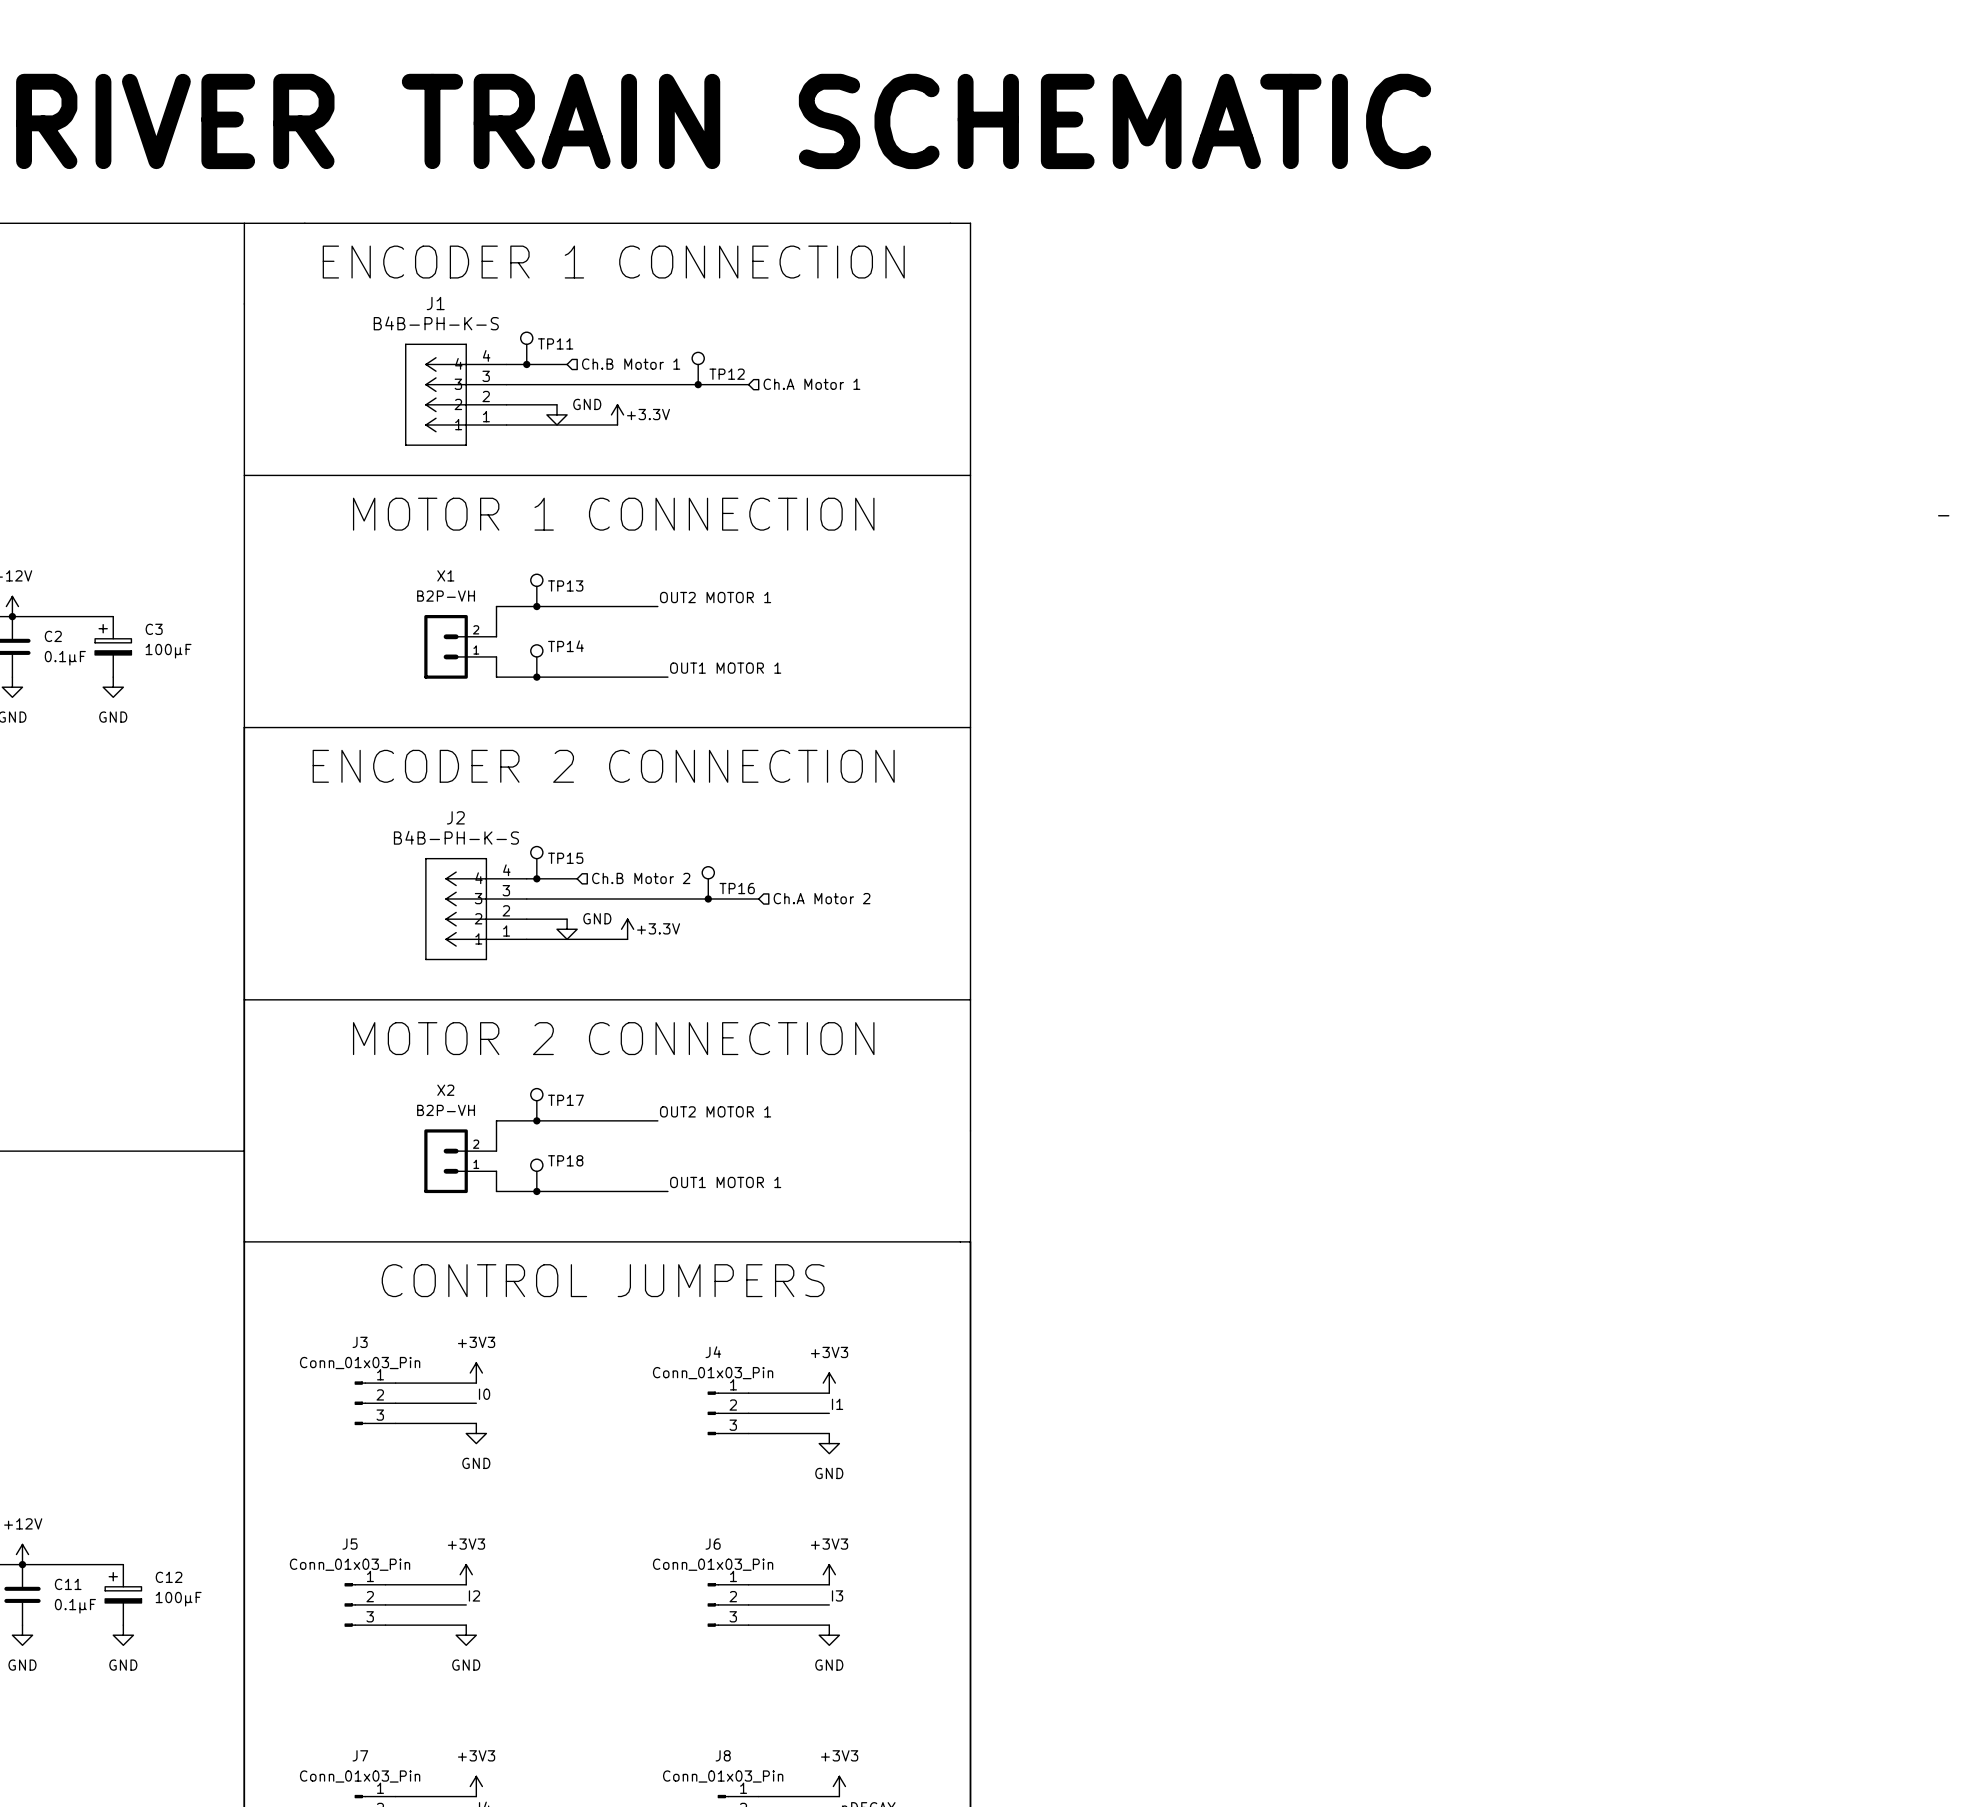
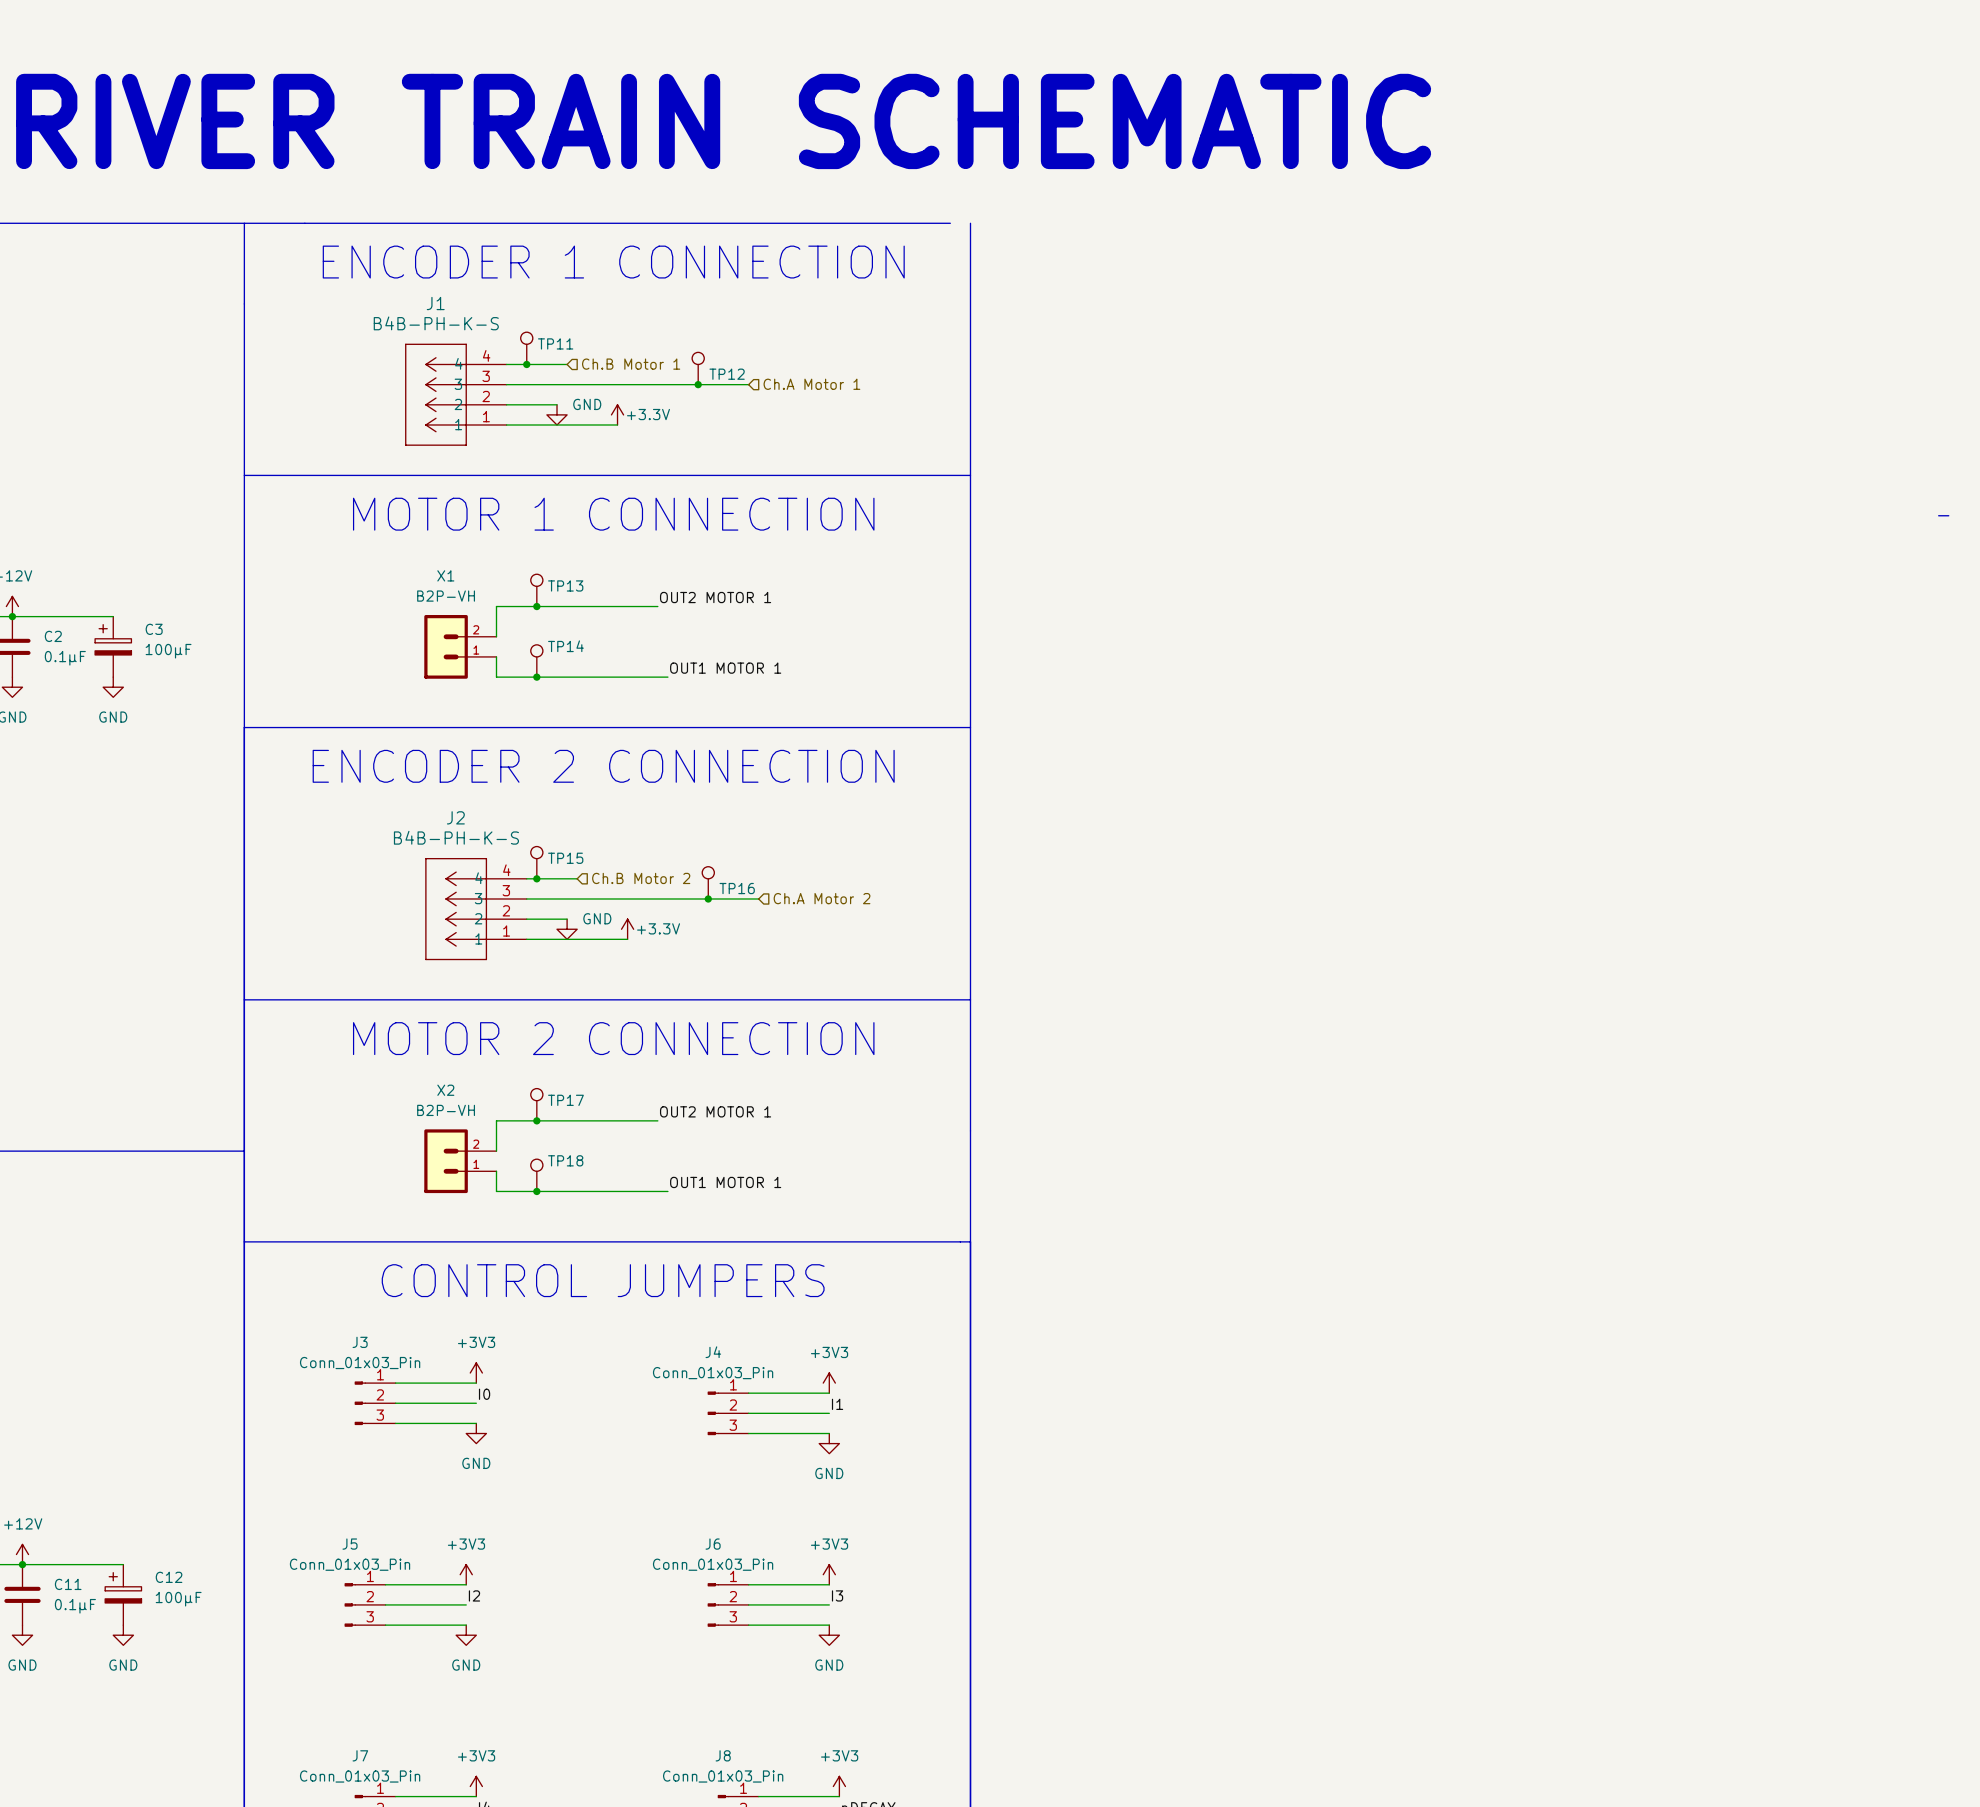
line: (950, 223) (970, 223) -> none

